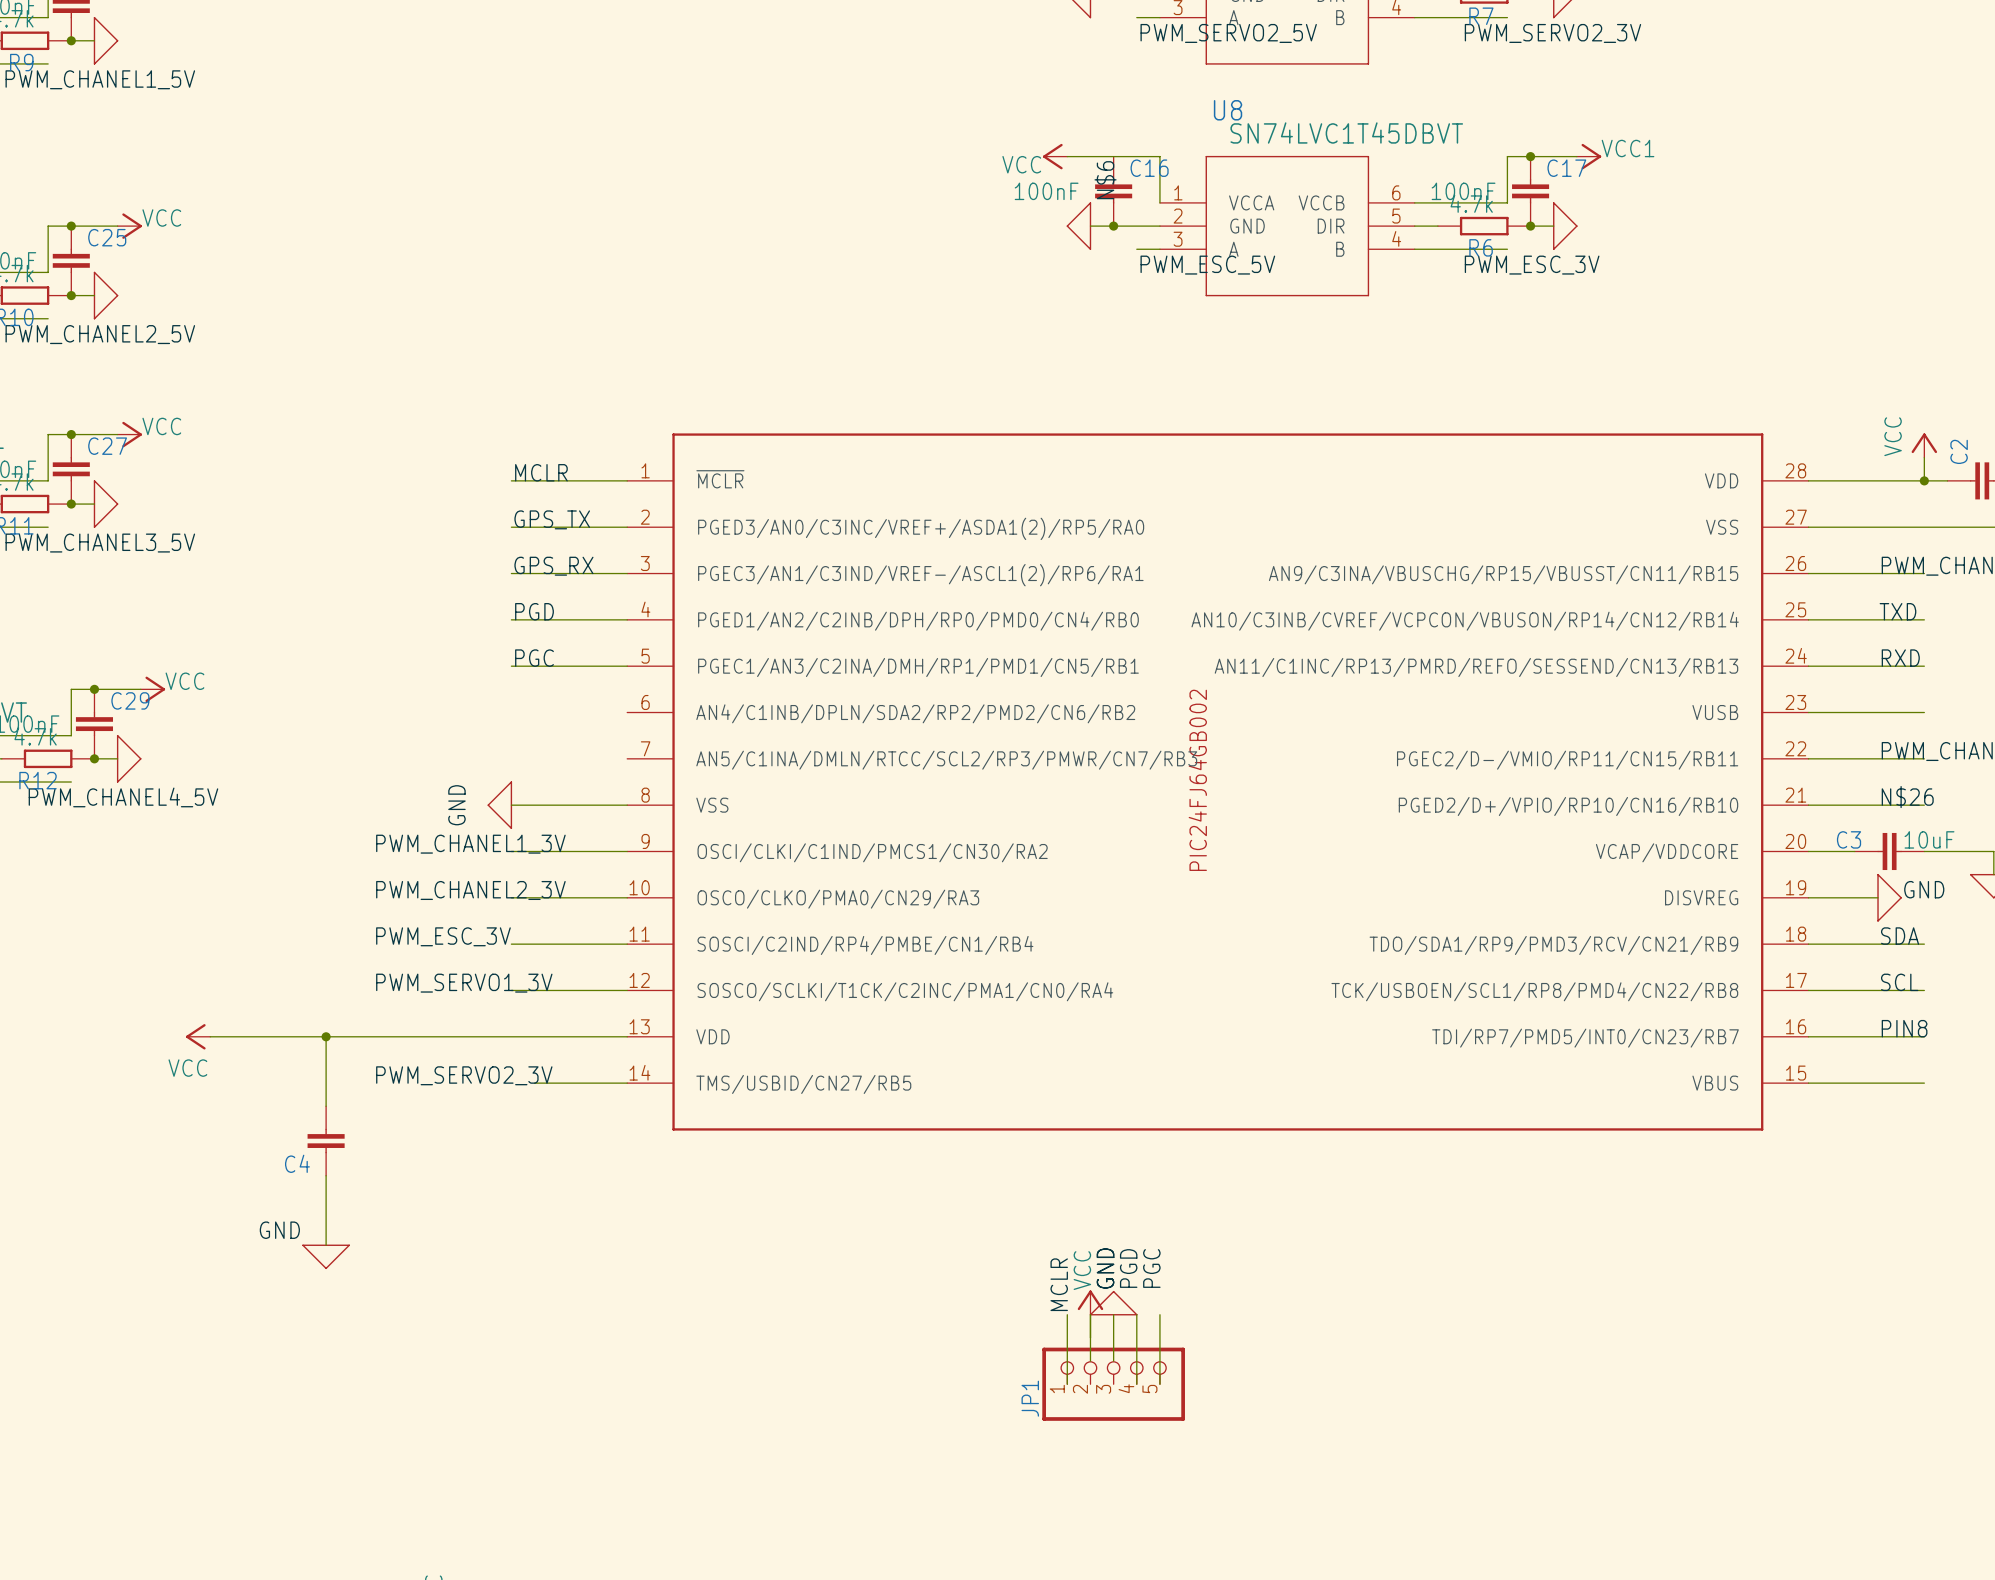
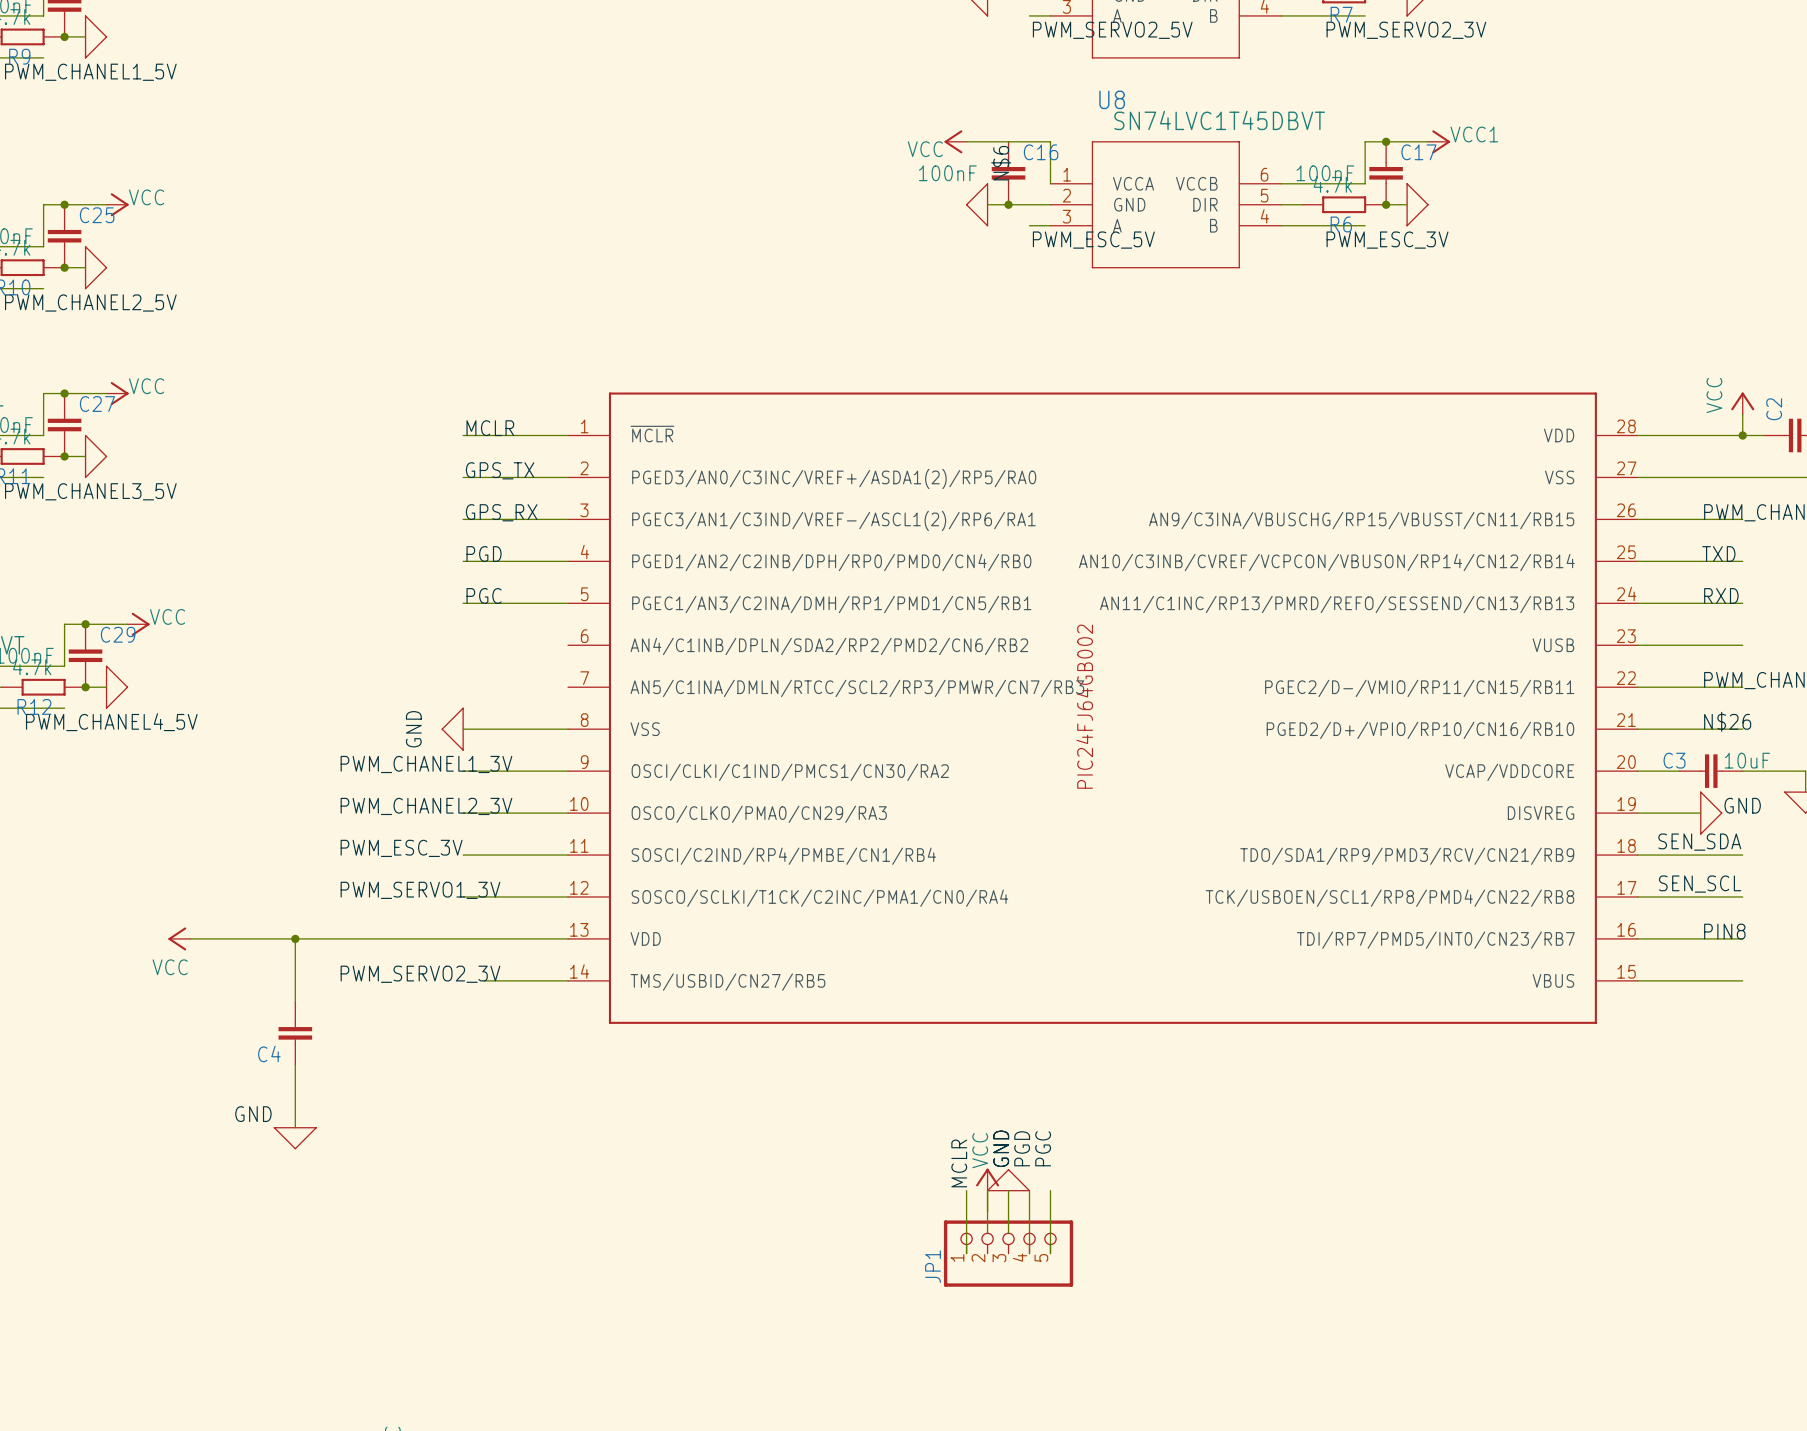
label: none -> SEN_SDA (1699, 842)
label: SDA (1900, 936) -> none
label: none -> SEN_SCL (1700, 884)
label: SCL (1899, 982) -> none

